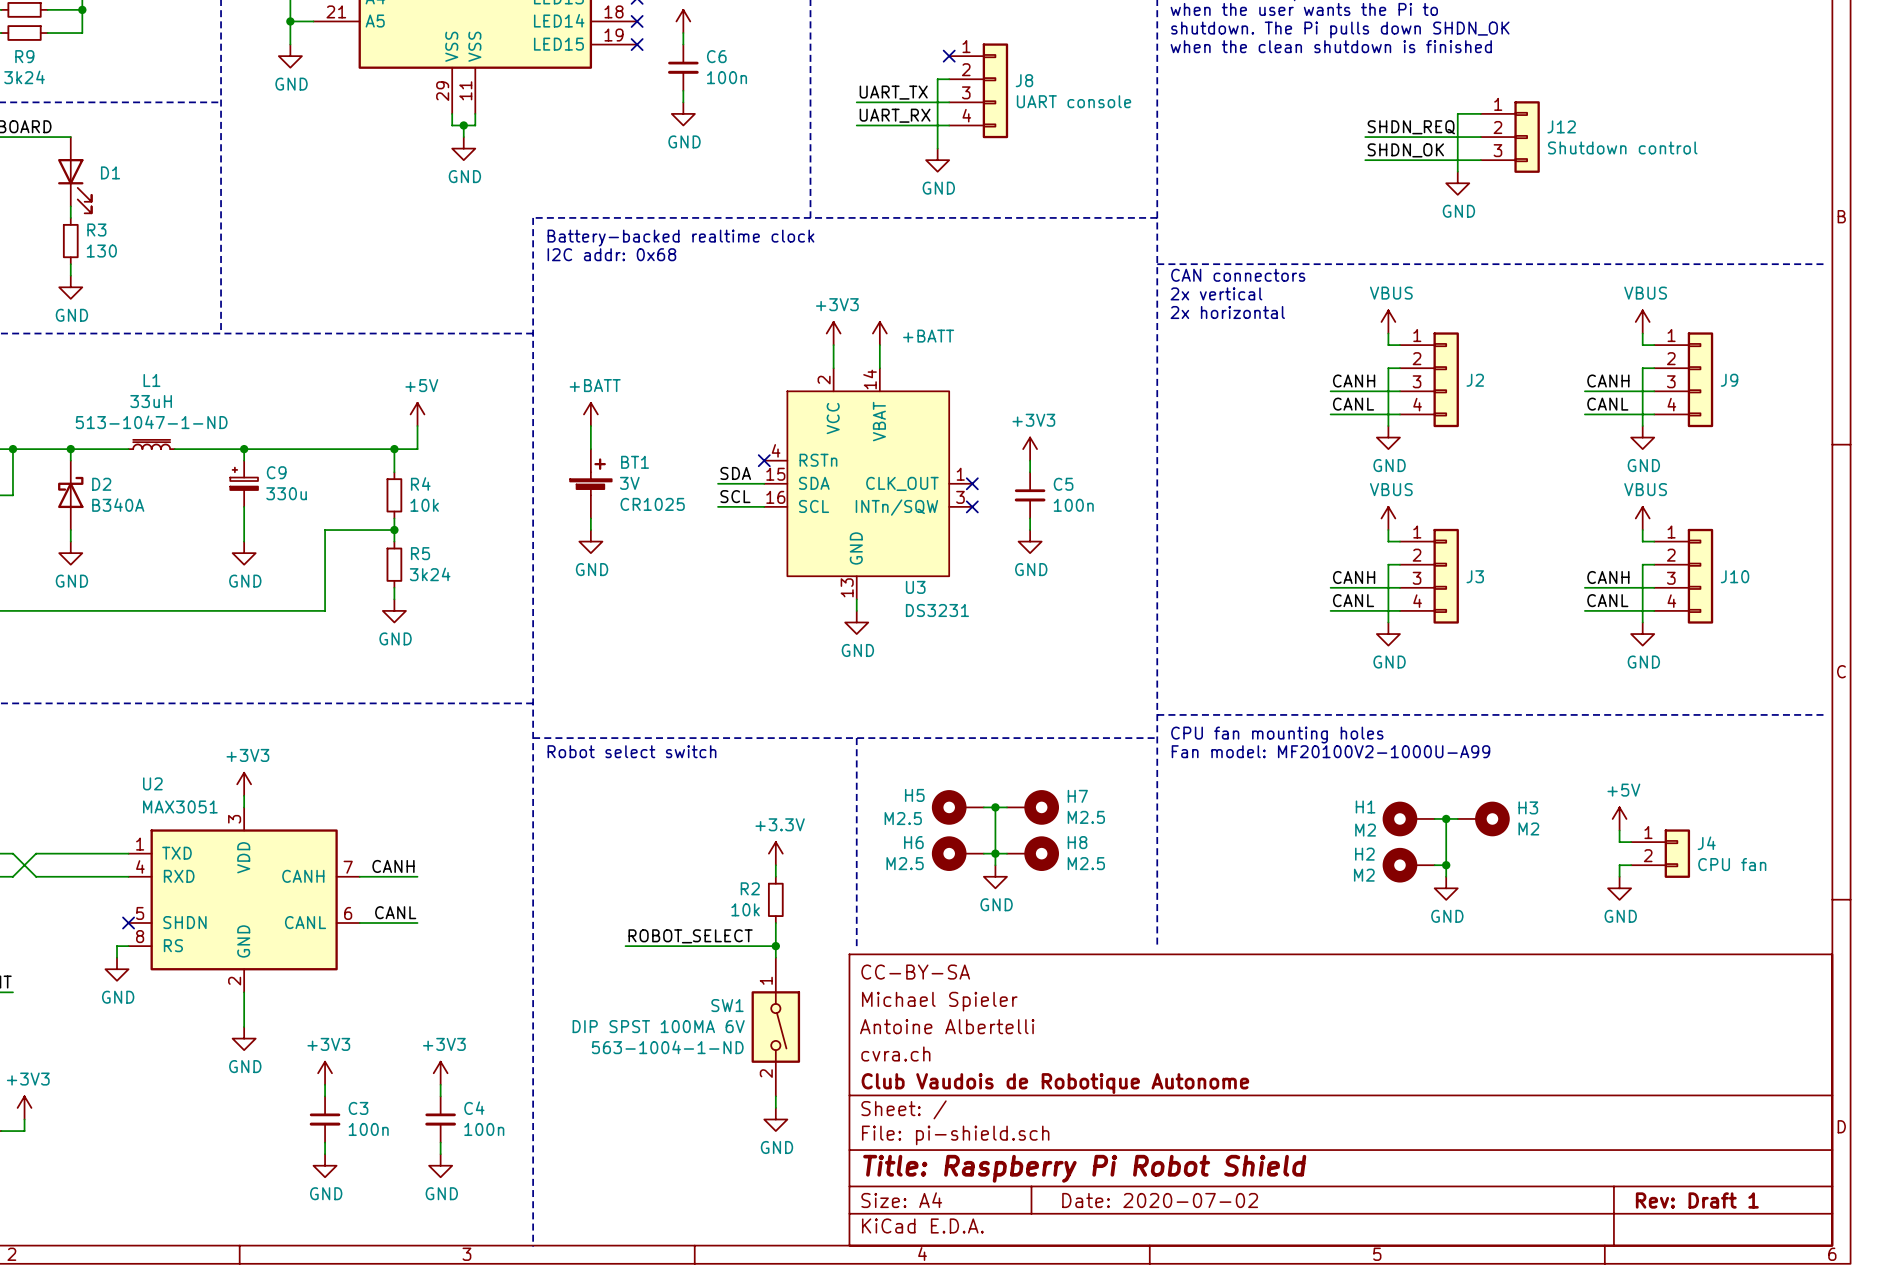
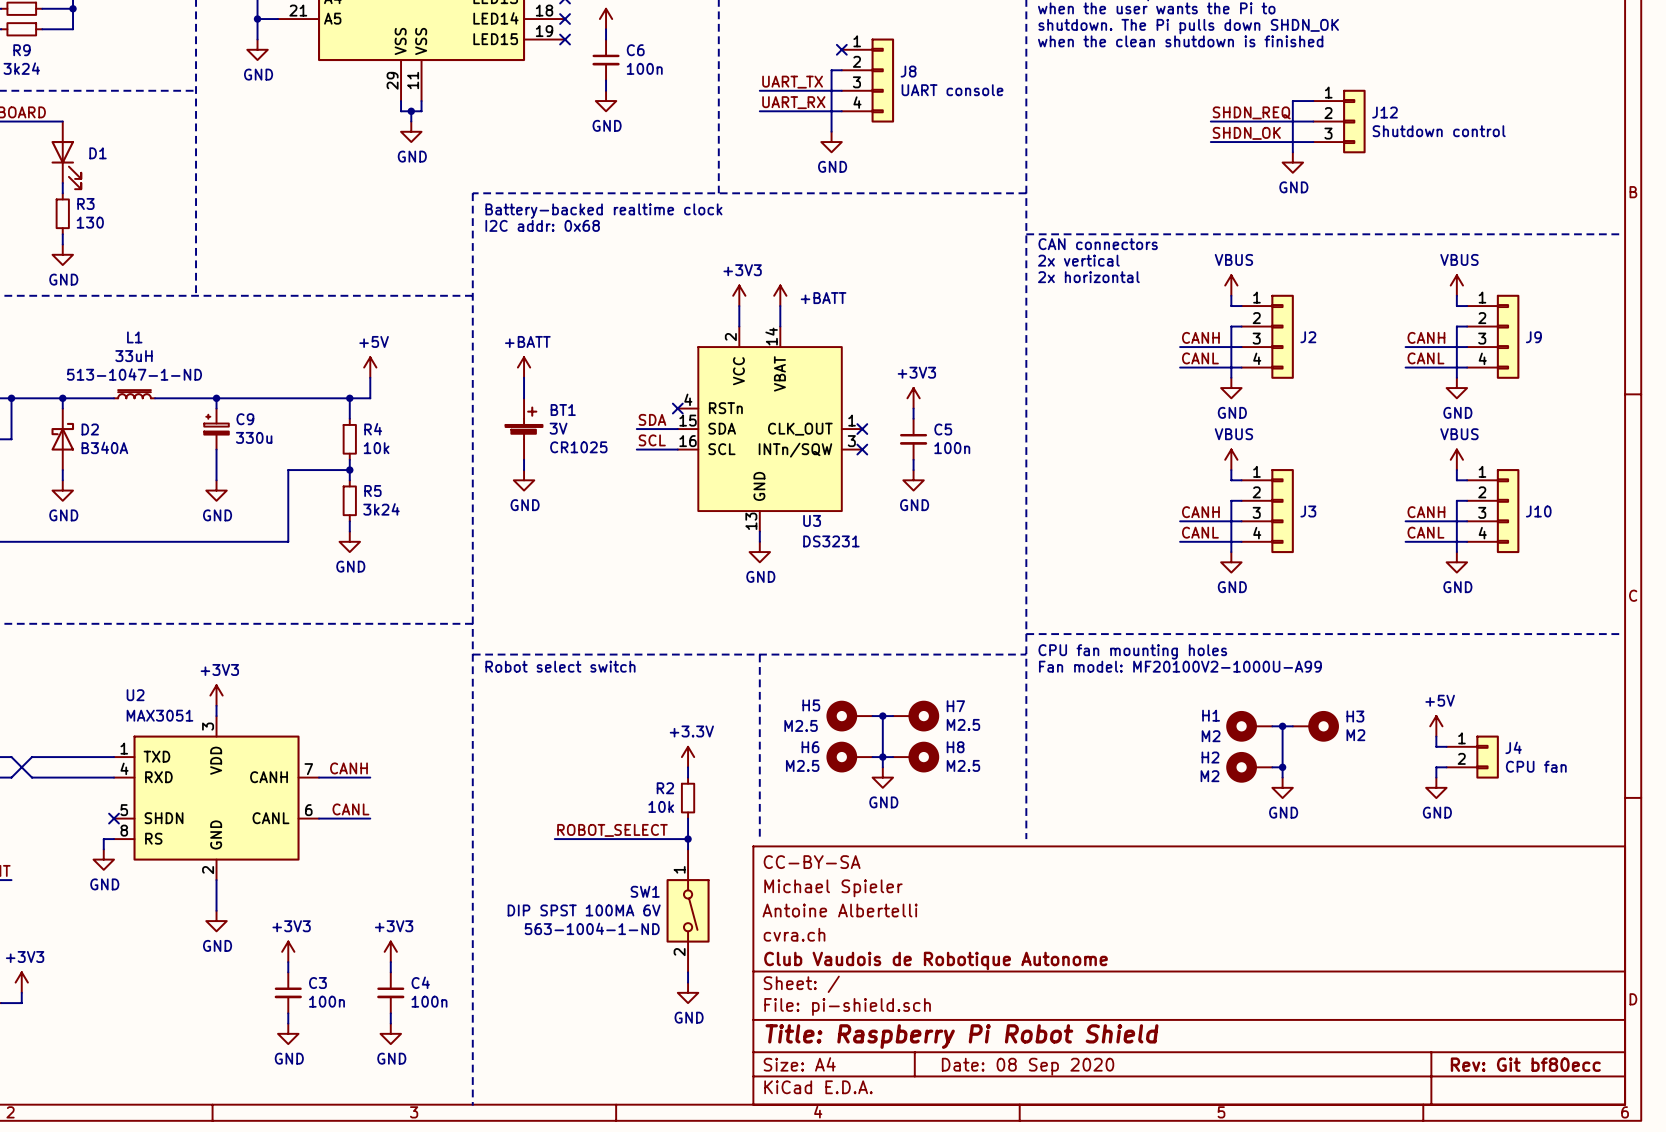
title block: Date: 2020-07-02 (1160, 1200) -> Date: 08 Sep 2020 (1028, 1066)
title block: Rev: Draft 1 (1697, 1200) -> Rev: Git bf80ecc (1525, 1064)

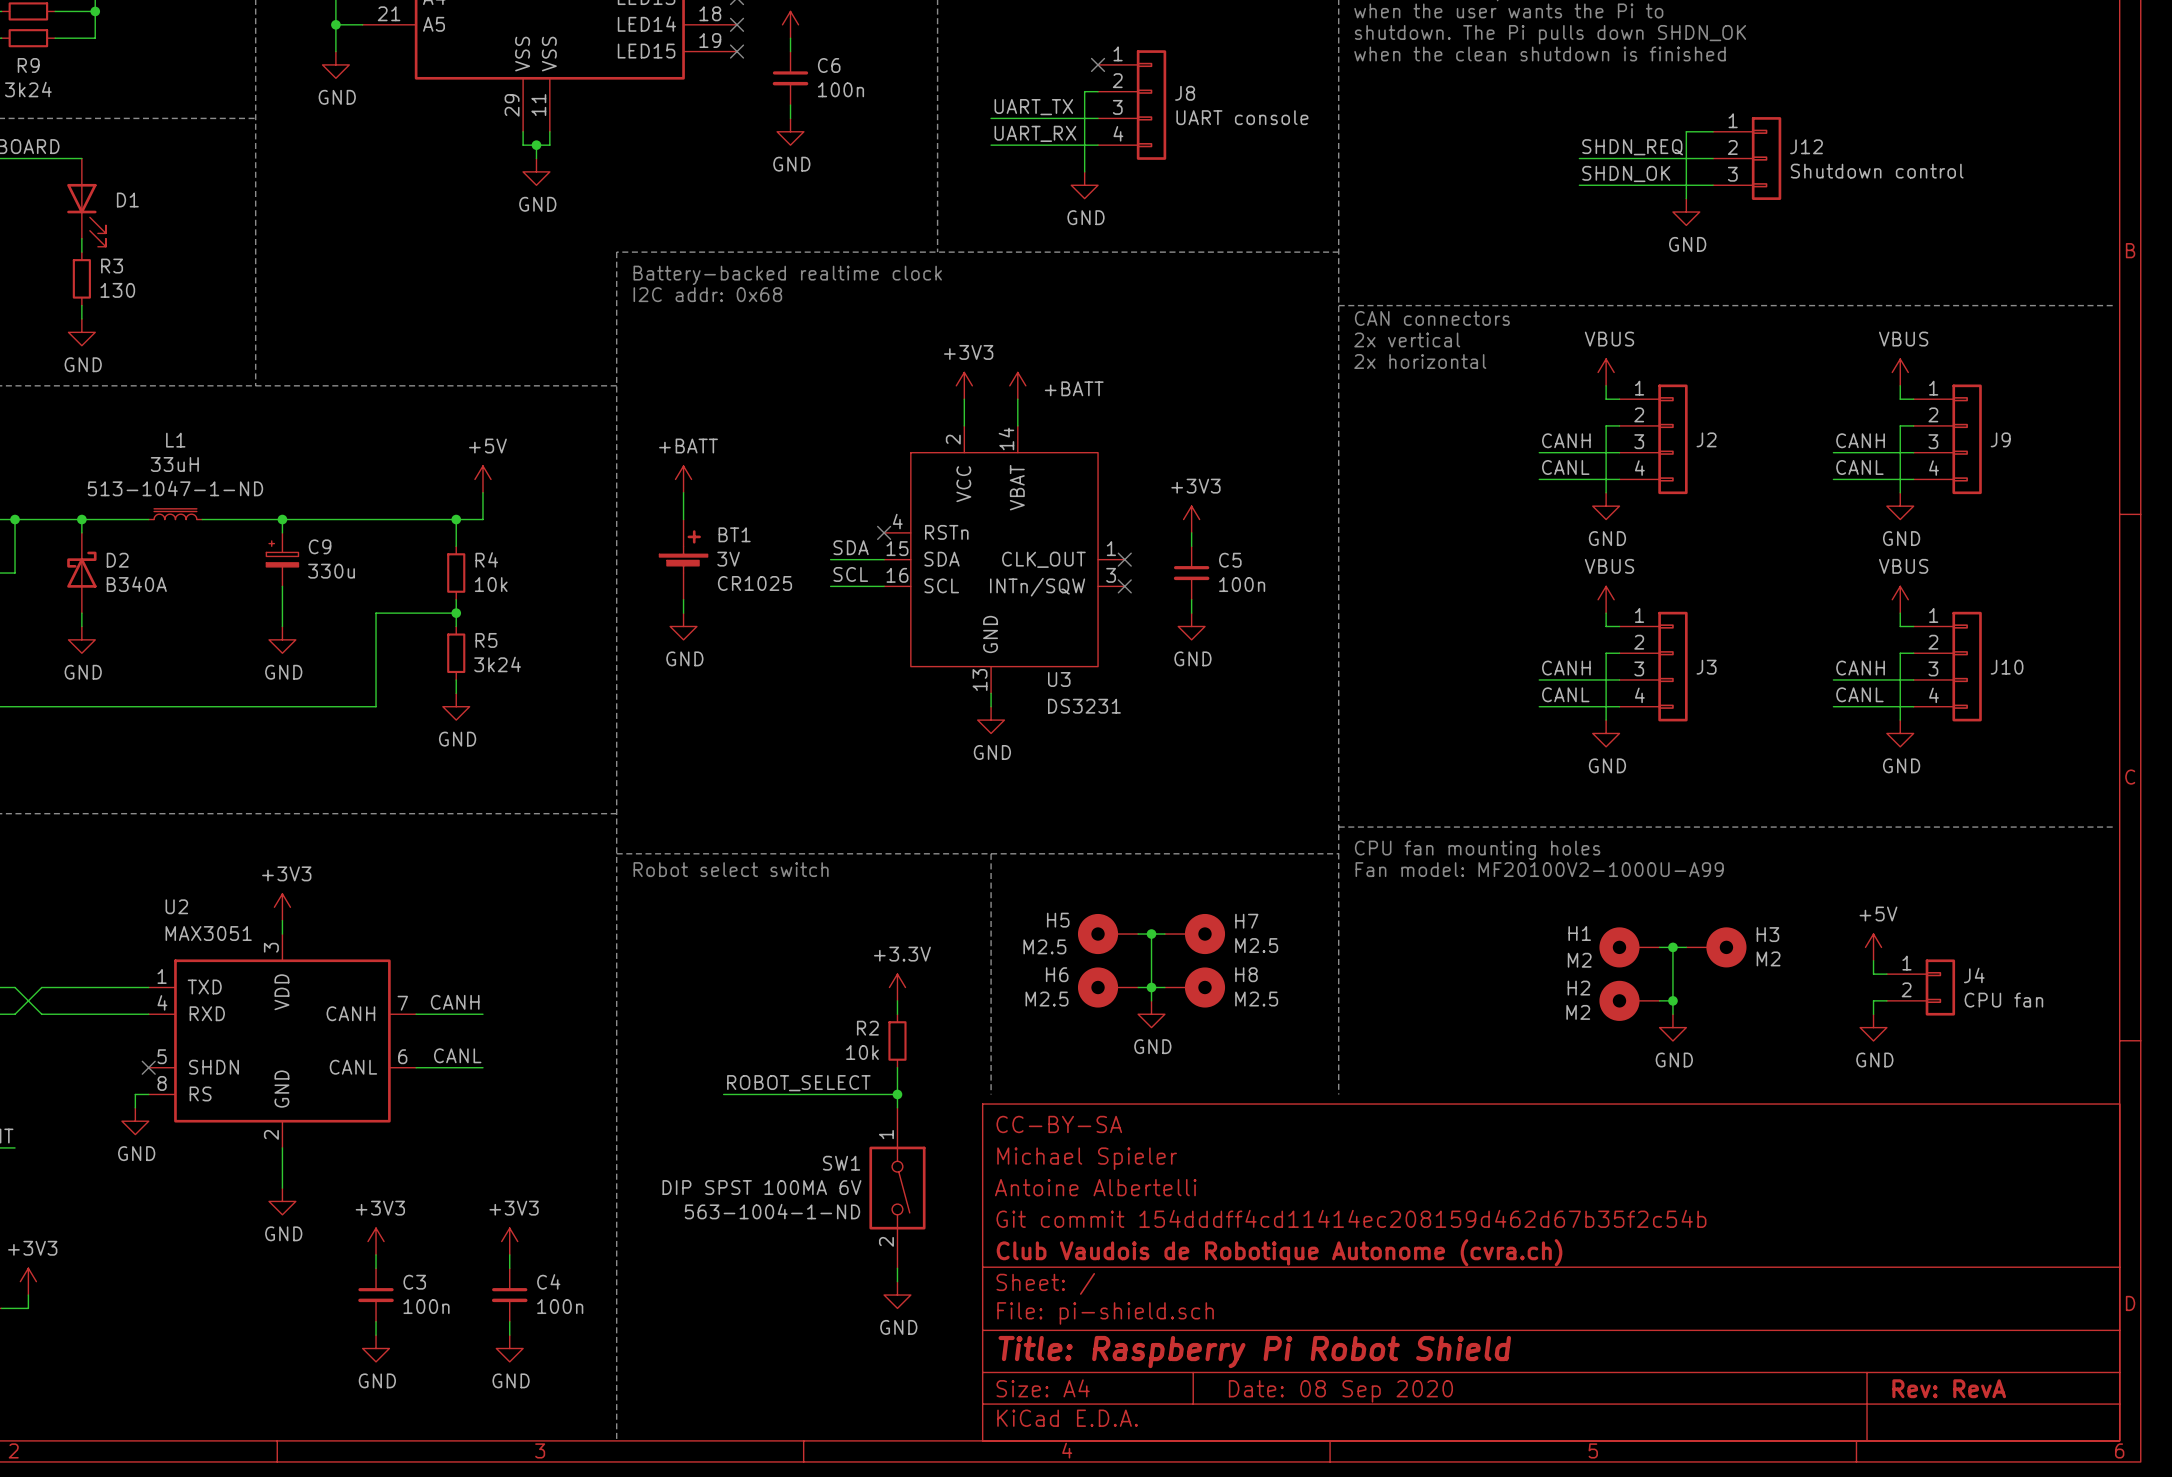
title block: cvra.ch (794, 934) -> Git commit 154dddff4cd11414ec208159d462d67b35f2c54b (1351, 1218)
title block: Club Vaudois de Robotique Autonome (935, 960) -> Club Vaudois de Robotique Autonome (cvra.ch) (1279, 1252)
title block: Rev: Git bf80ecc (1525, 1064) -> Rev: RevA (1949, 1388)

